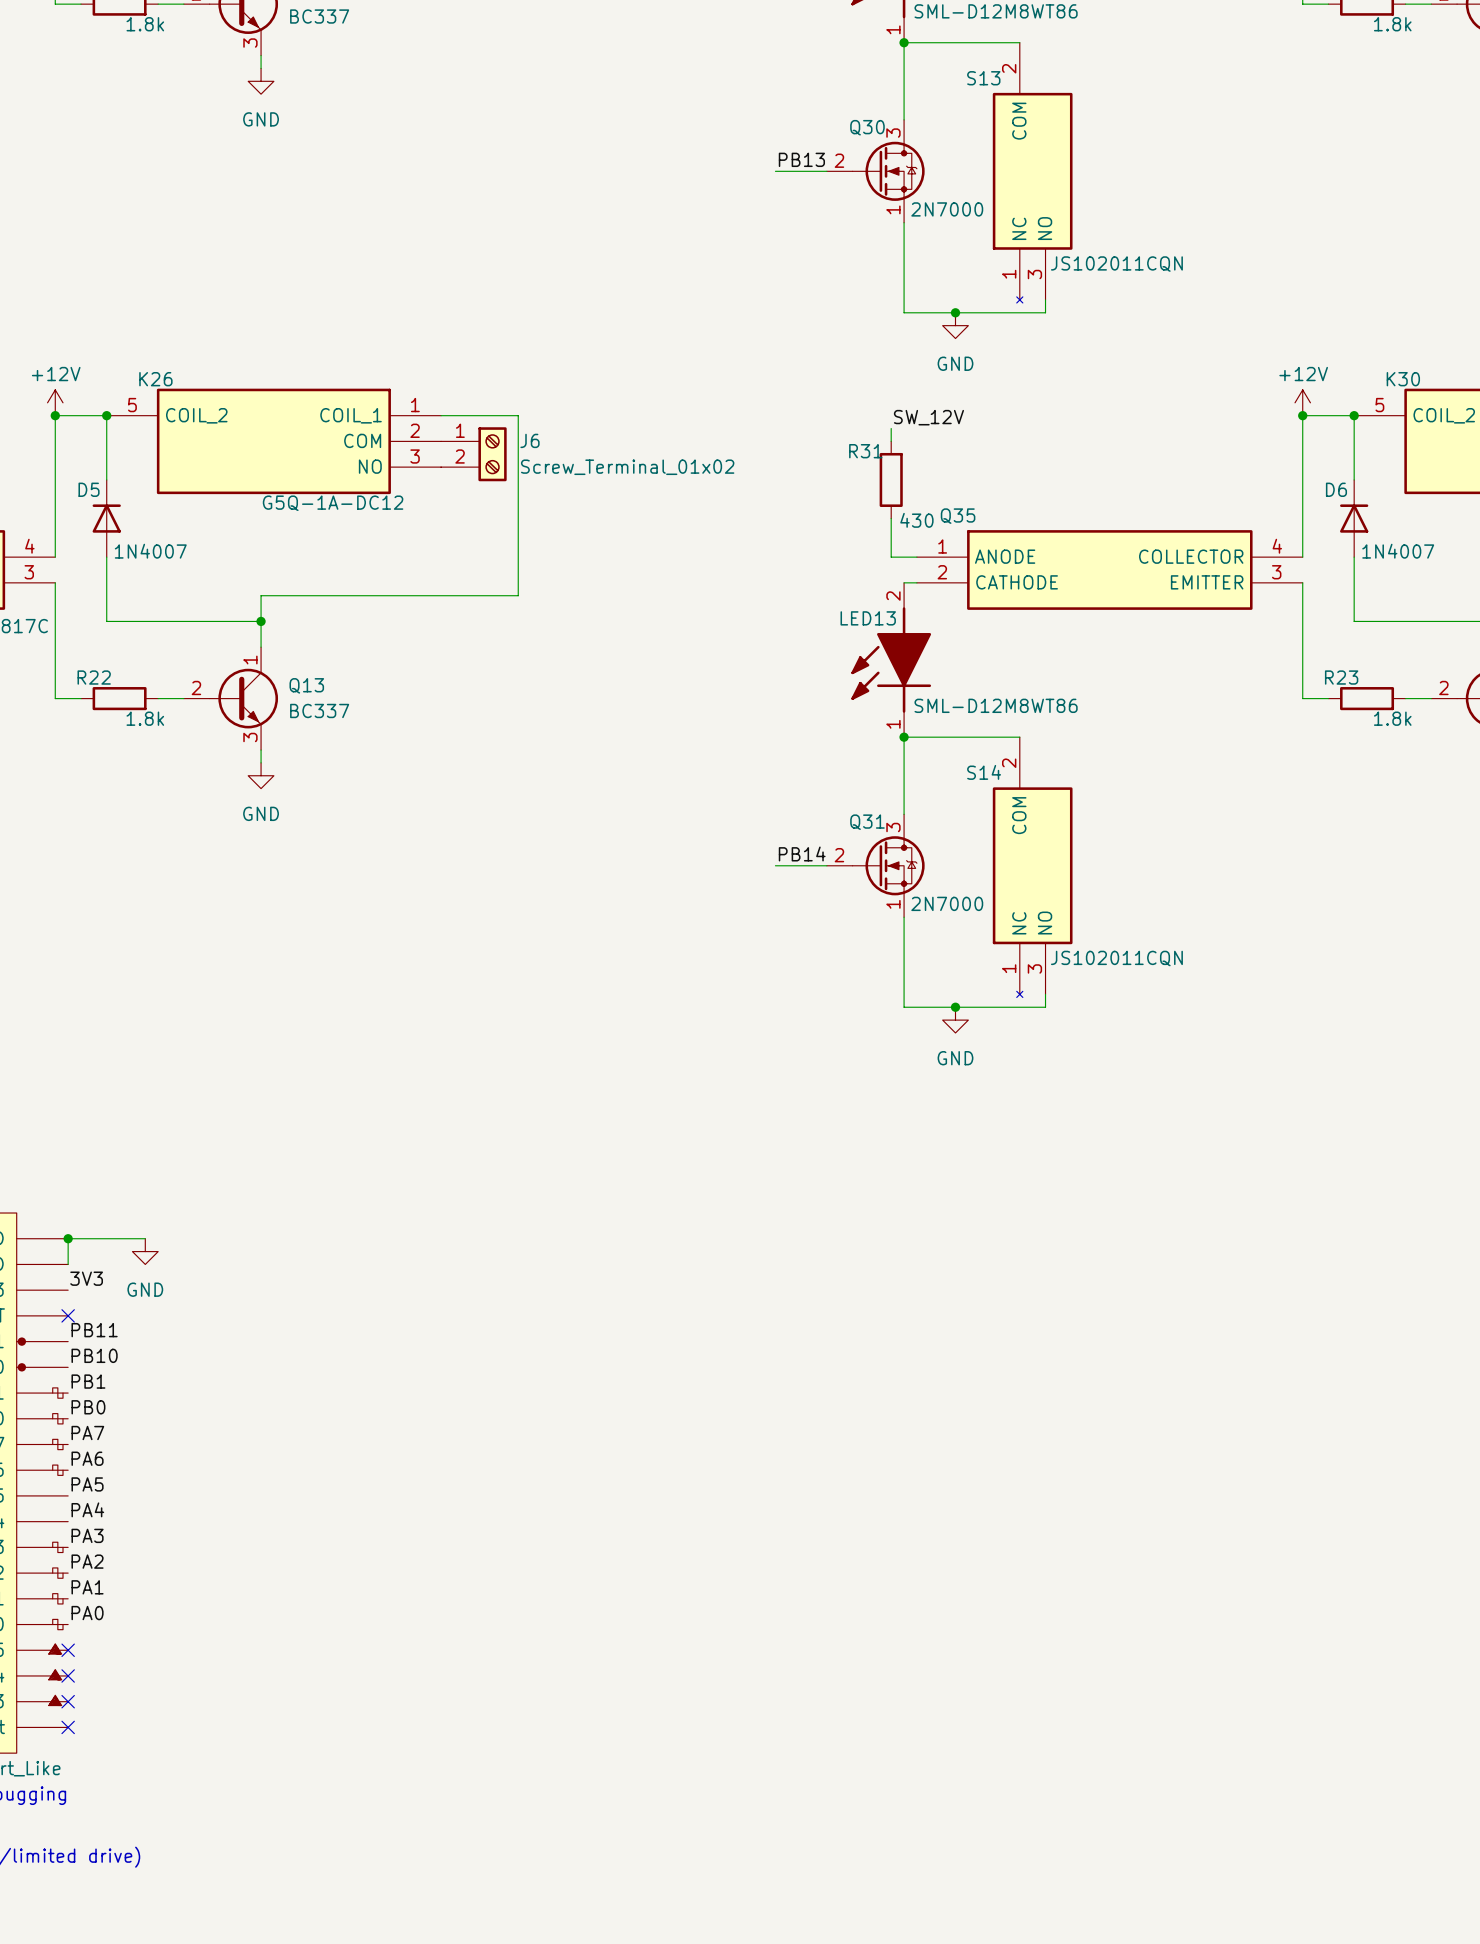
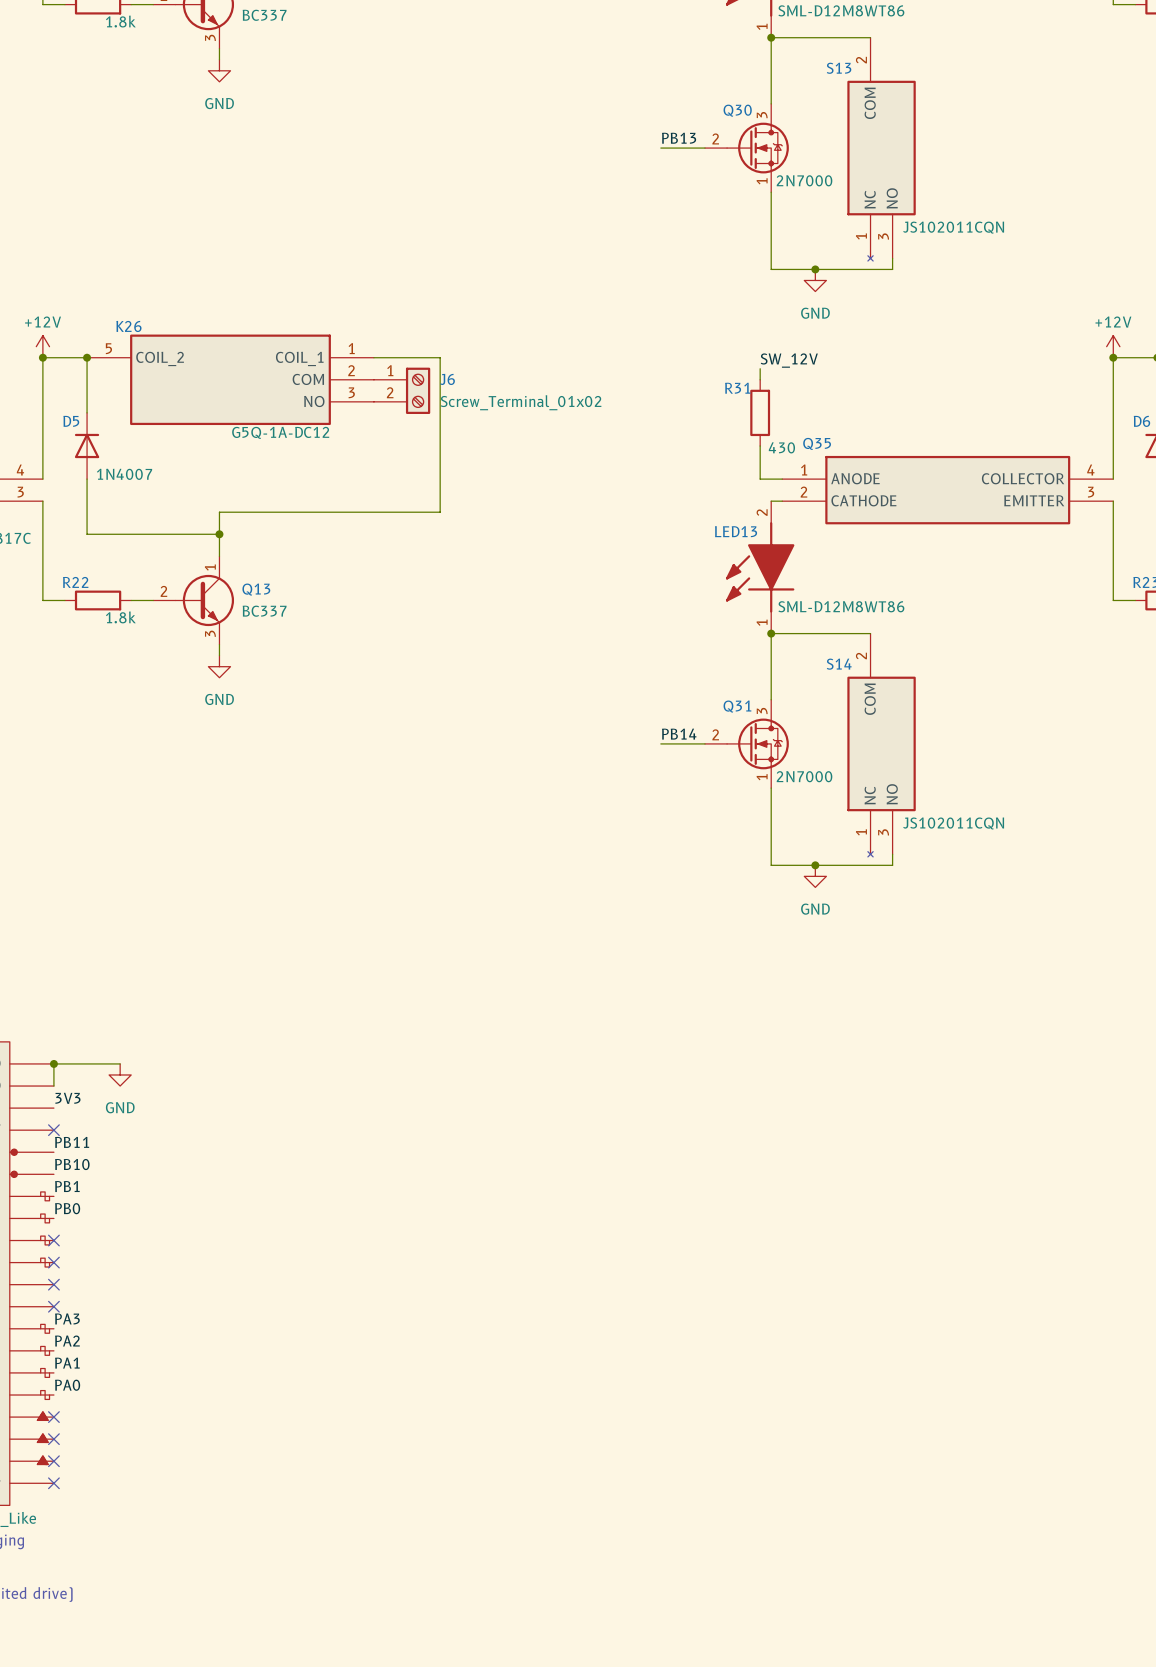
label: PA7 (87, 1433) -> none
no-connect mark: none -> (53, 1240)
label: PA6 (87, 1458) -> none
no-connect mark: none -> (53, 1262)
label: PA5 (87, 1484) -> none
no-connect mark: none -> (53, 1284)
label: PA4 (87, 1509) -> none
no-connect mark: none -> (53, 1306)

